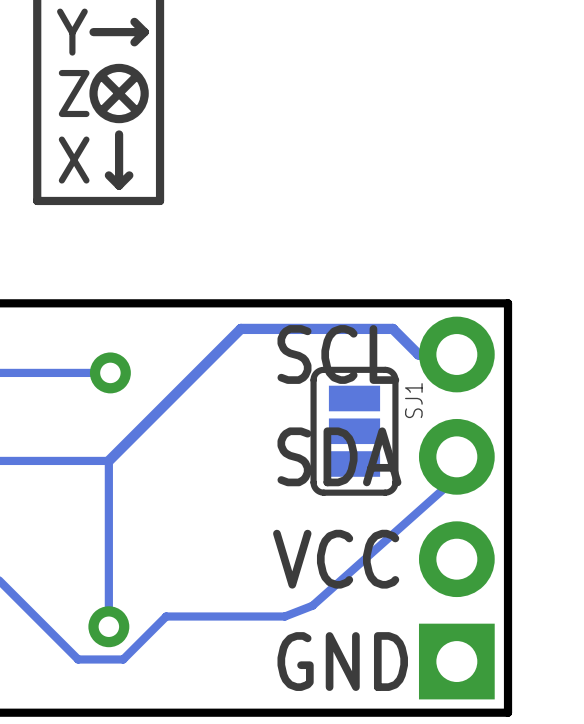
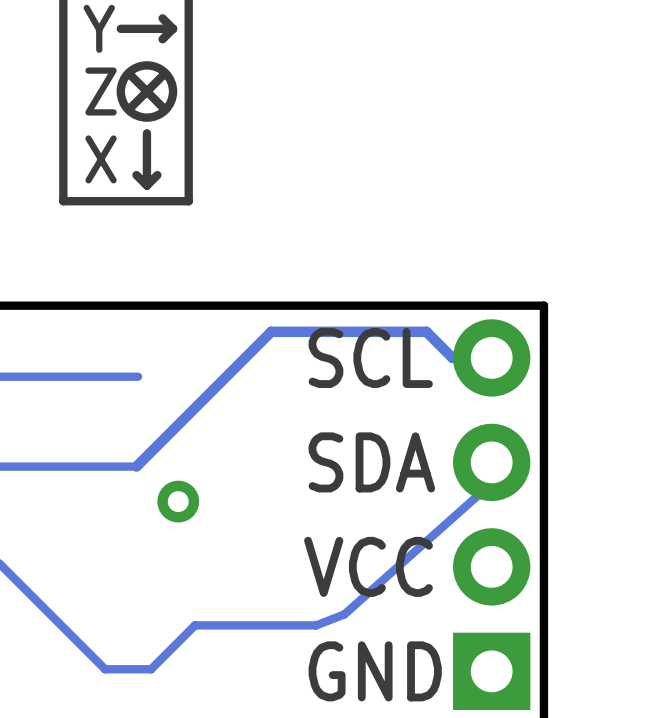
via: (110, 372) -> none
SJ1: (354, 431) -> none
track: (108, 460) (108, 626) -> none
via: none -> (178, 501)
via: (108, 626) -> none

